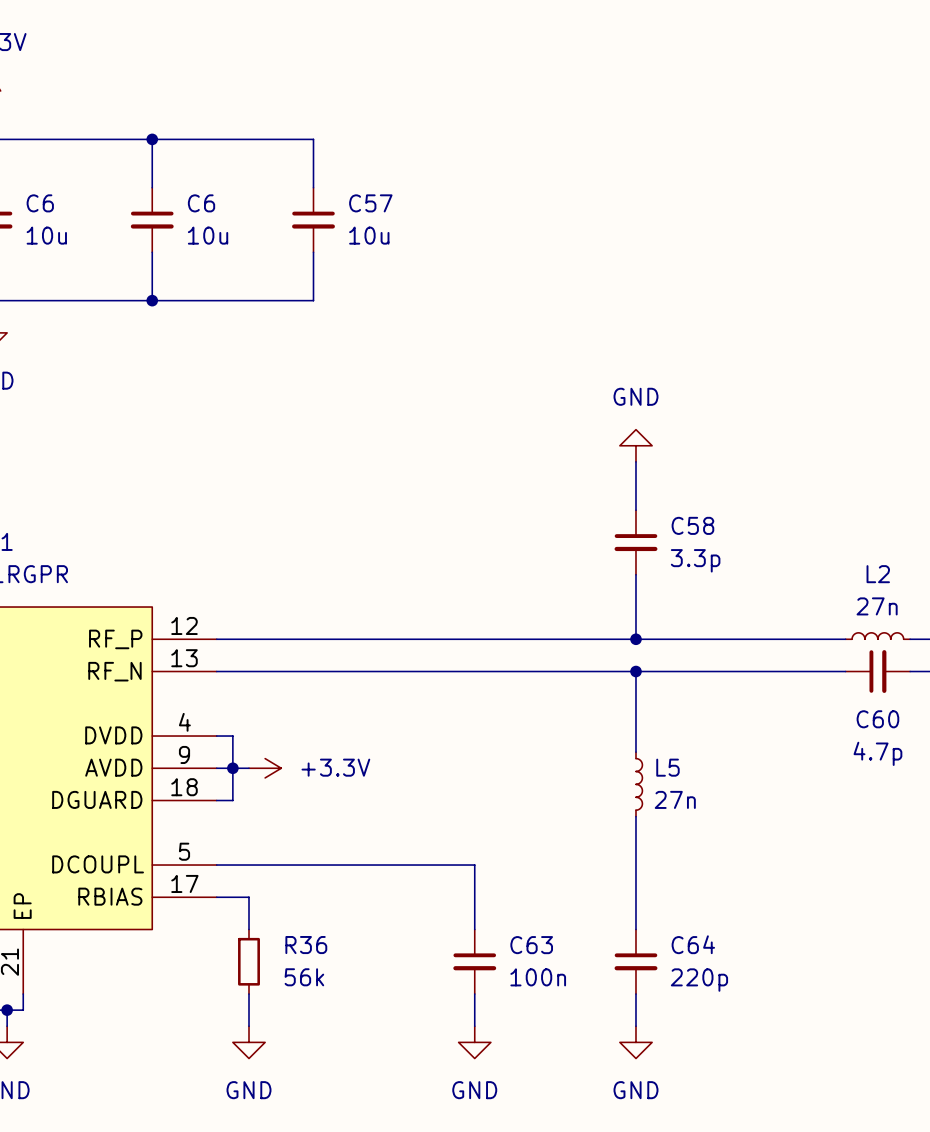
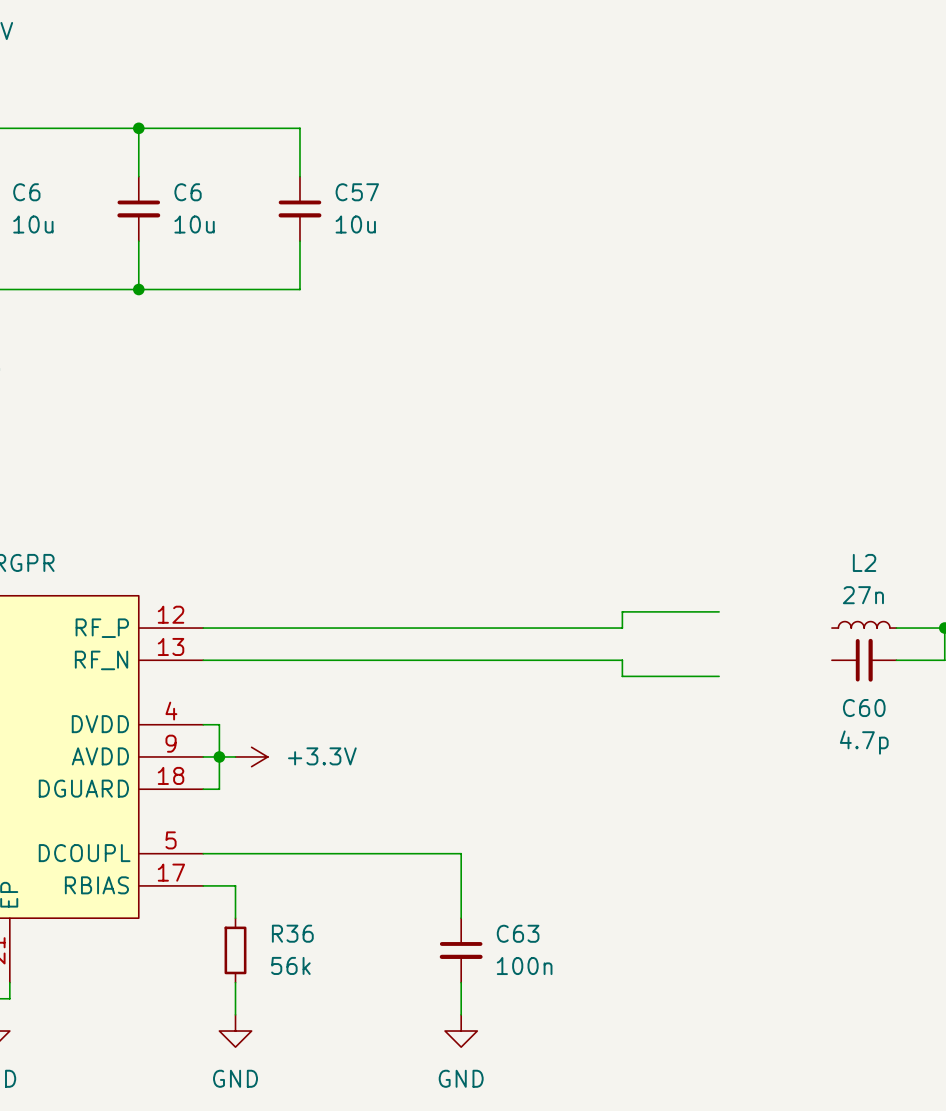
power symbol: GND (635, 445) -> none
wire: (635, 461) (635, 510) -> none
C58: 3.3p (635, 542) -> none
wire: (635, 574) (635, 623) -> (719, 611) (622, 611)
wire: (635, 639) (845, 639) -> none
junction: (635, 639) -> none
wire: (635, 671) (845, 671) -> none
junction: (635, 671) -> none
wire: (635, 687) (635, 752) -> (622, 676) (719, 676)
L5: 27n (639, 784) -> none
wire: (635, 816) (635, 929) -> none
C64: 220p (635, 961) -> none
wire: (635, 994) (635, 1026) -> none
power symbol: GND (635, 1042) -> none

